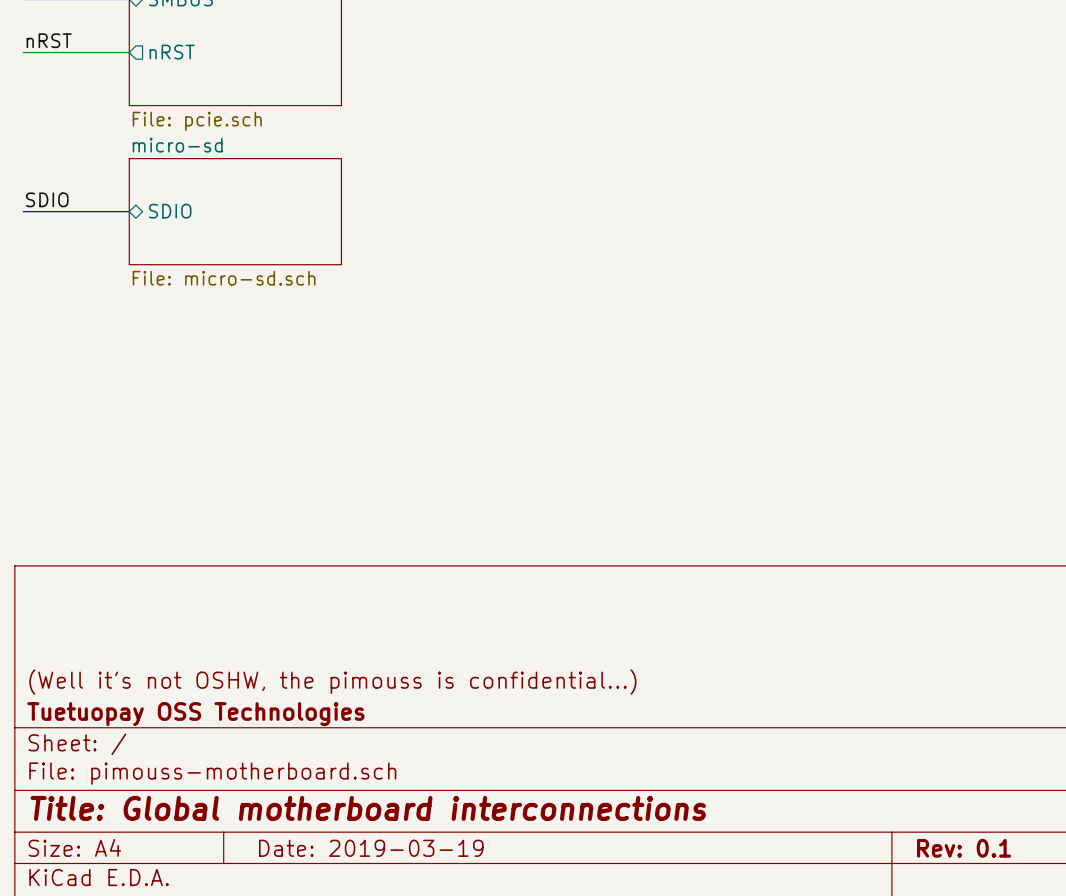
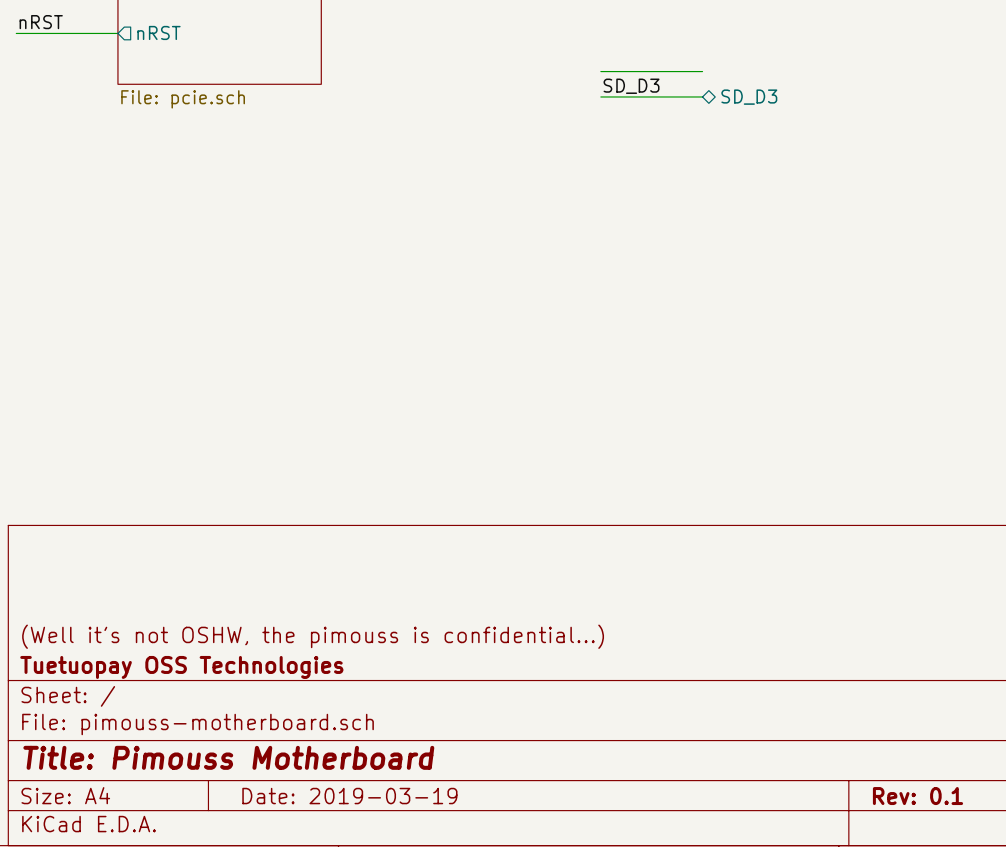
wire: none -> (600, 71) (702, 71)
label: none -> SD_D3 (631, 86)
wire: none -> (600, 96) (702, 96)
sheet pin: none -> SD_D3 (749, 97)
label: SDIO (47, 199) -> none
bus: (23, 211) (129, 211) -> none
sheet pin: SDIO (170, 211) -> none
sheet micro-sd: File: micro-sd.sch (235, 211) -> none
title block: Title: Global motherboard interconnections (368, 808) -> Title: Pimouss Motherboard (228, 757)

